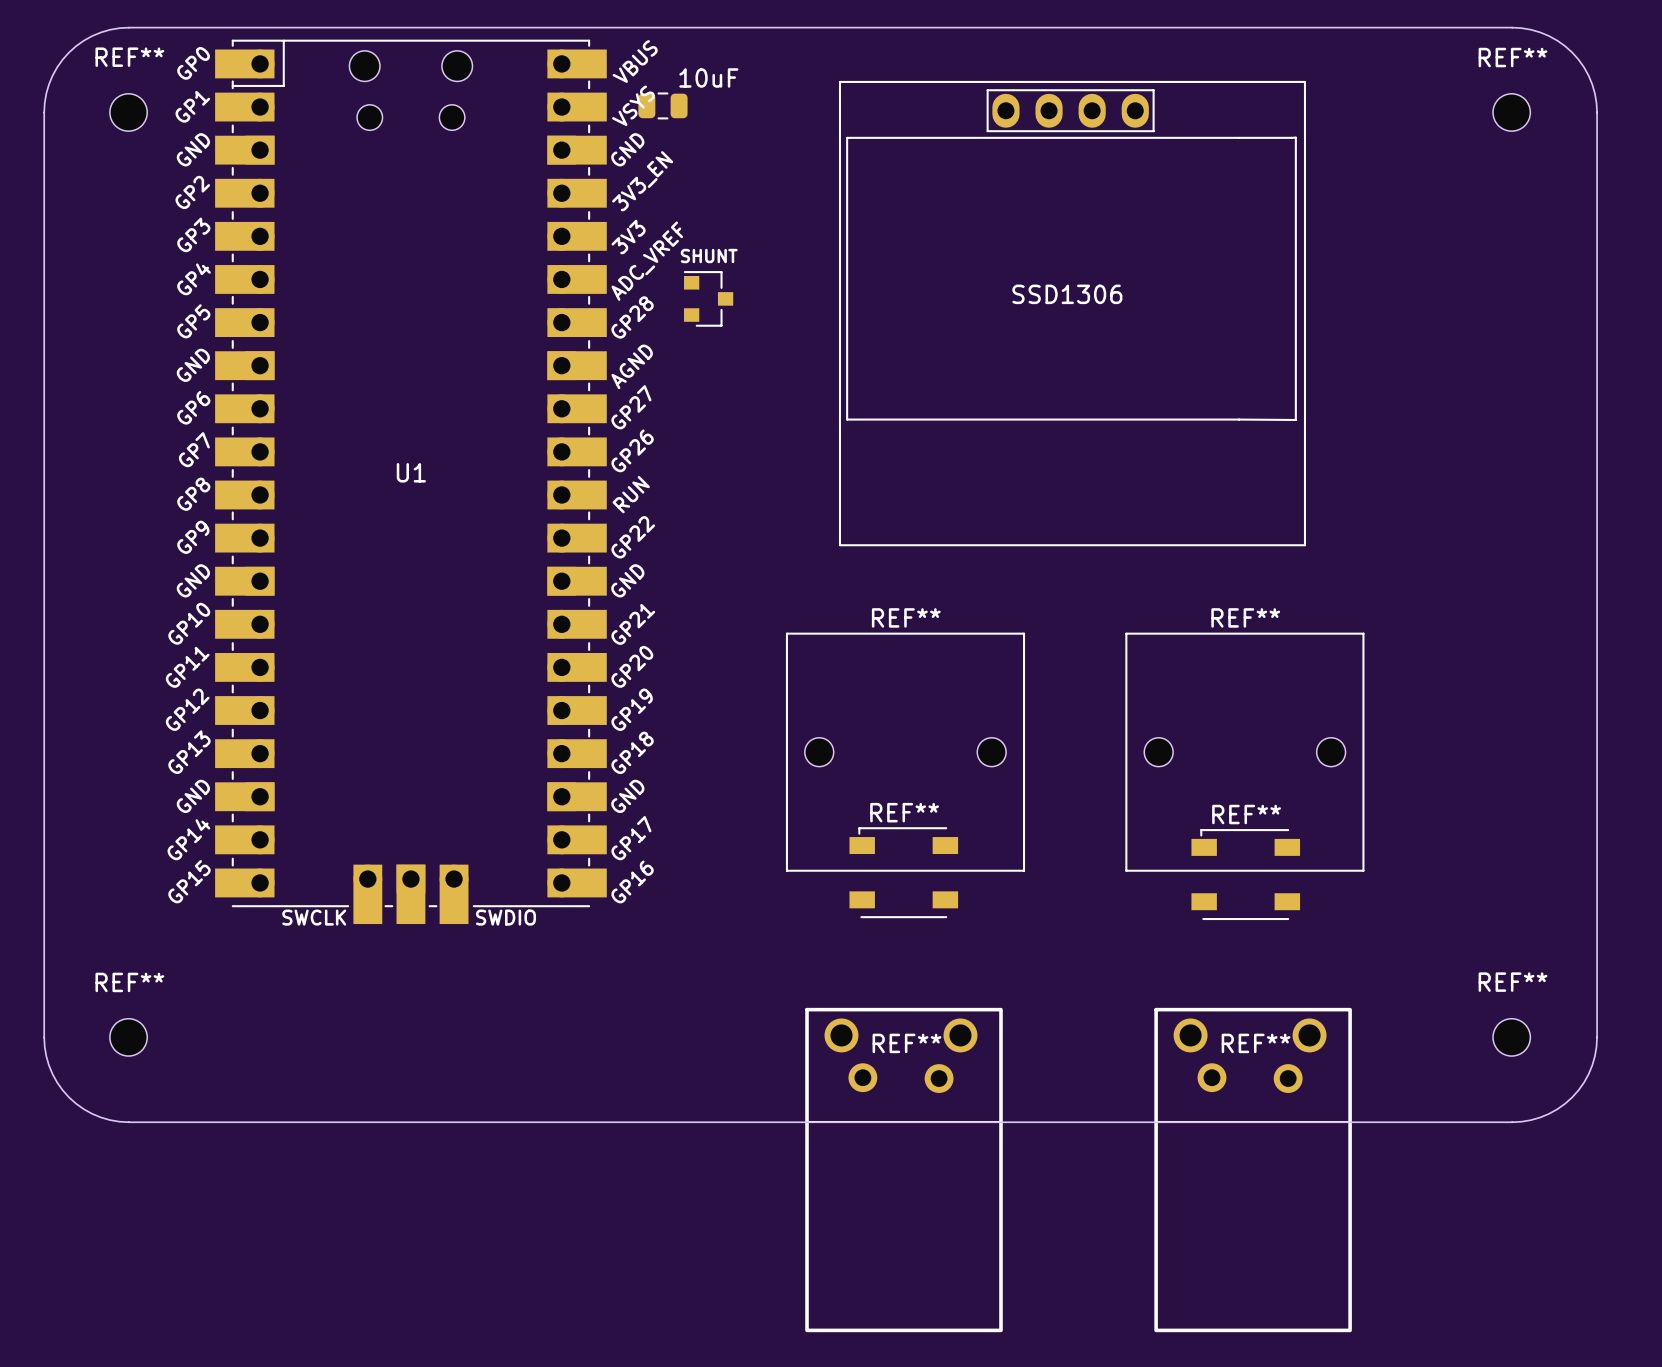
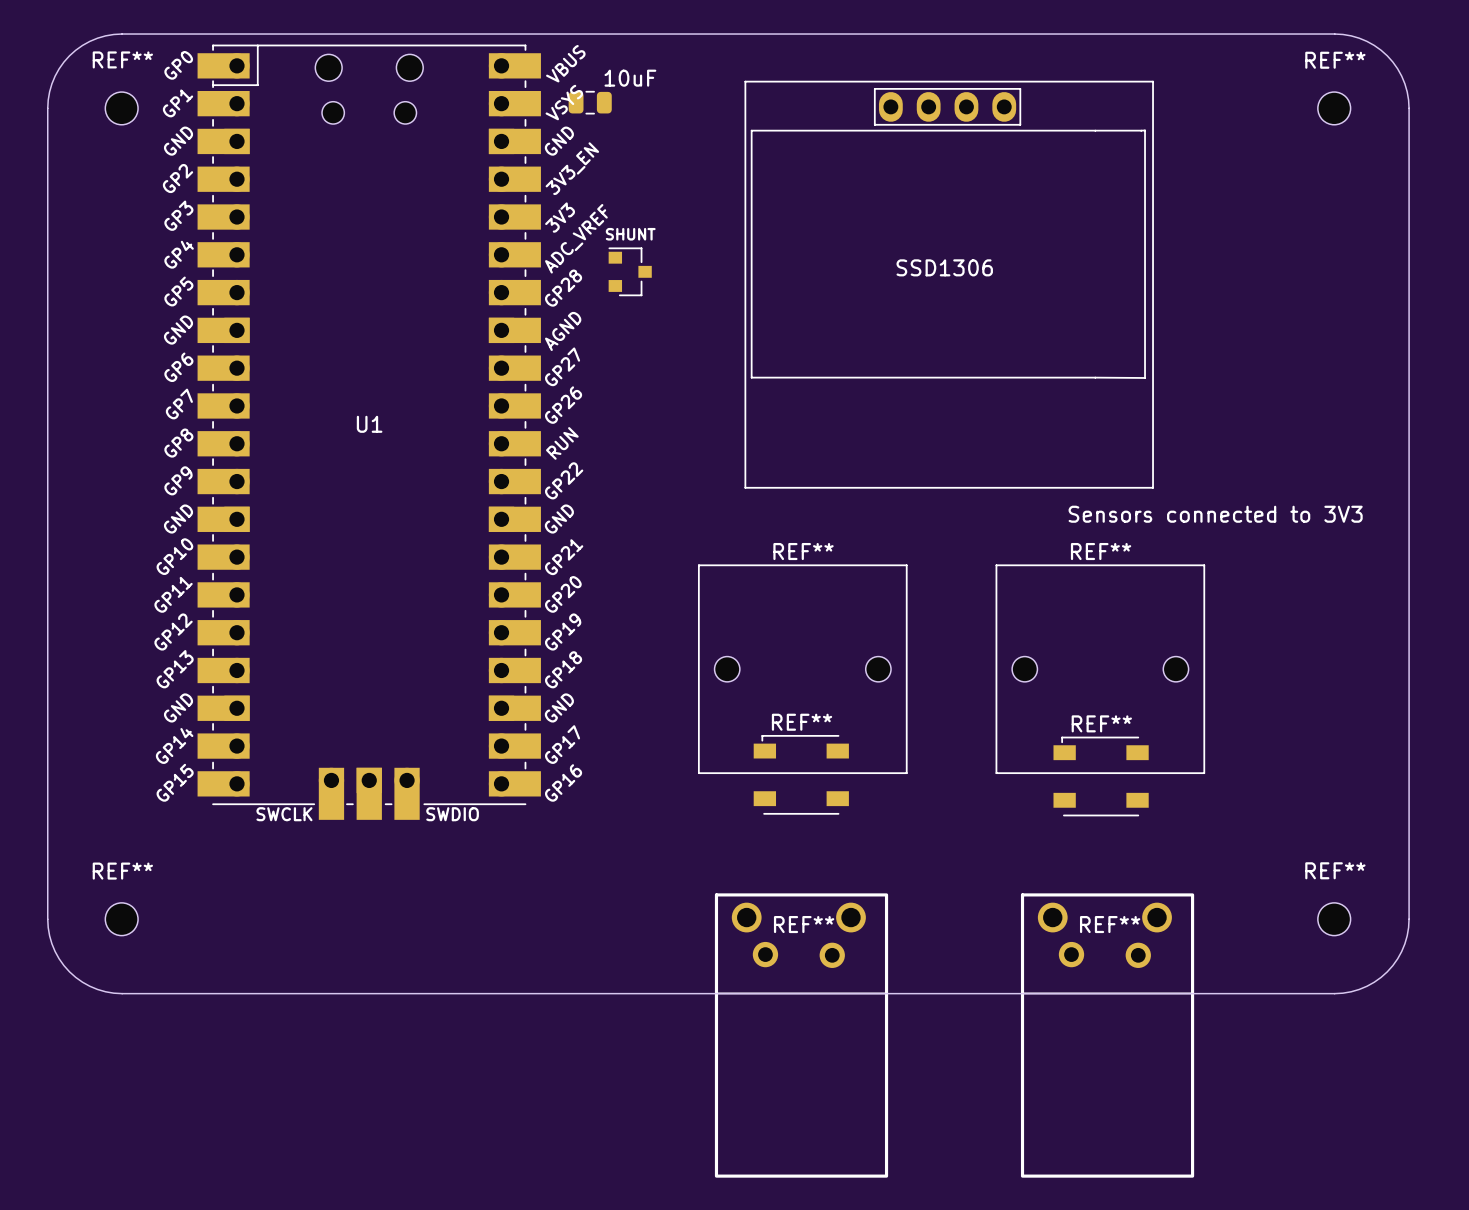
text: none -> Sensors connected to 3V3 (1215, 514)

